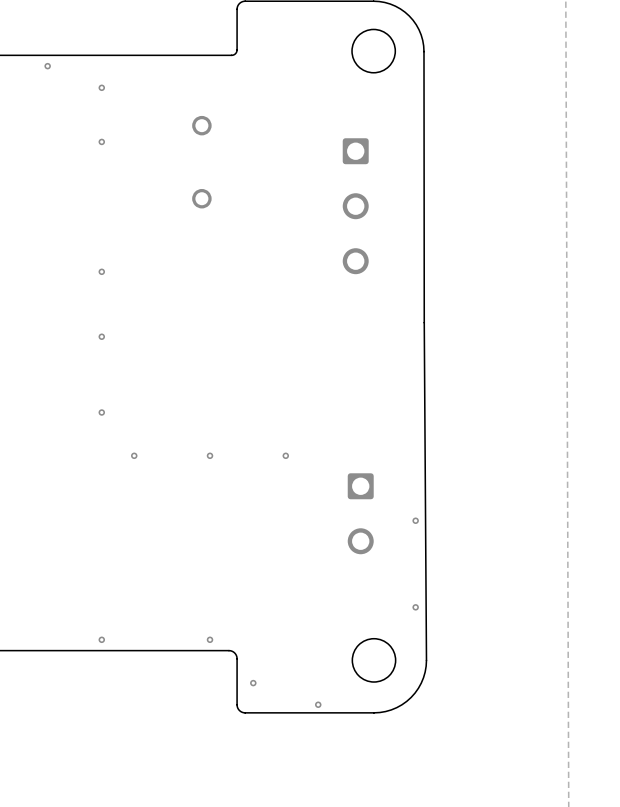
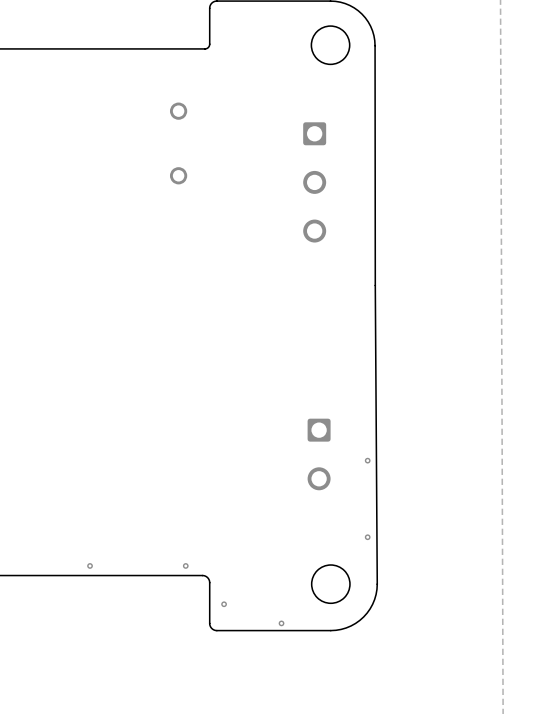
via: (47, 66) -> none
via: (101, 87) -> none
via: (101, 141) -> none
via: (101, 271) -> none
via: (101, 336) -> none
via: (101, 412) -> none
via: (134, 455) -> none
via: (210, 455) -> none
via: (285, 455) -> none

